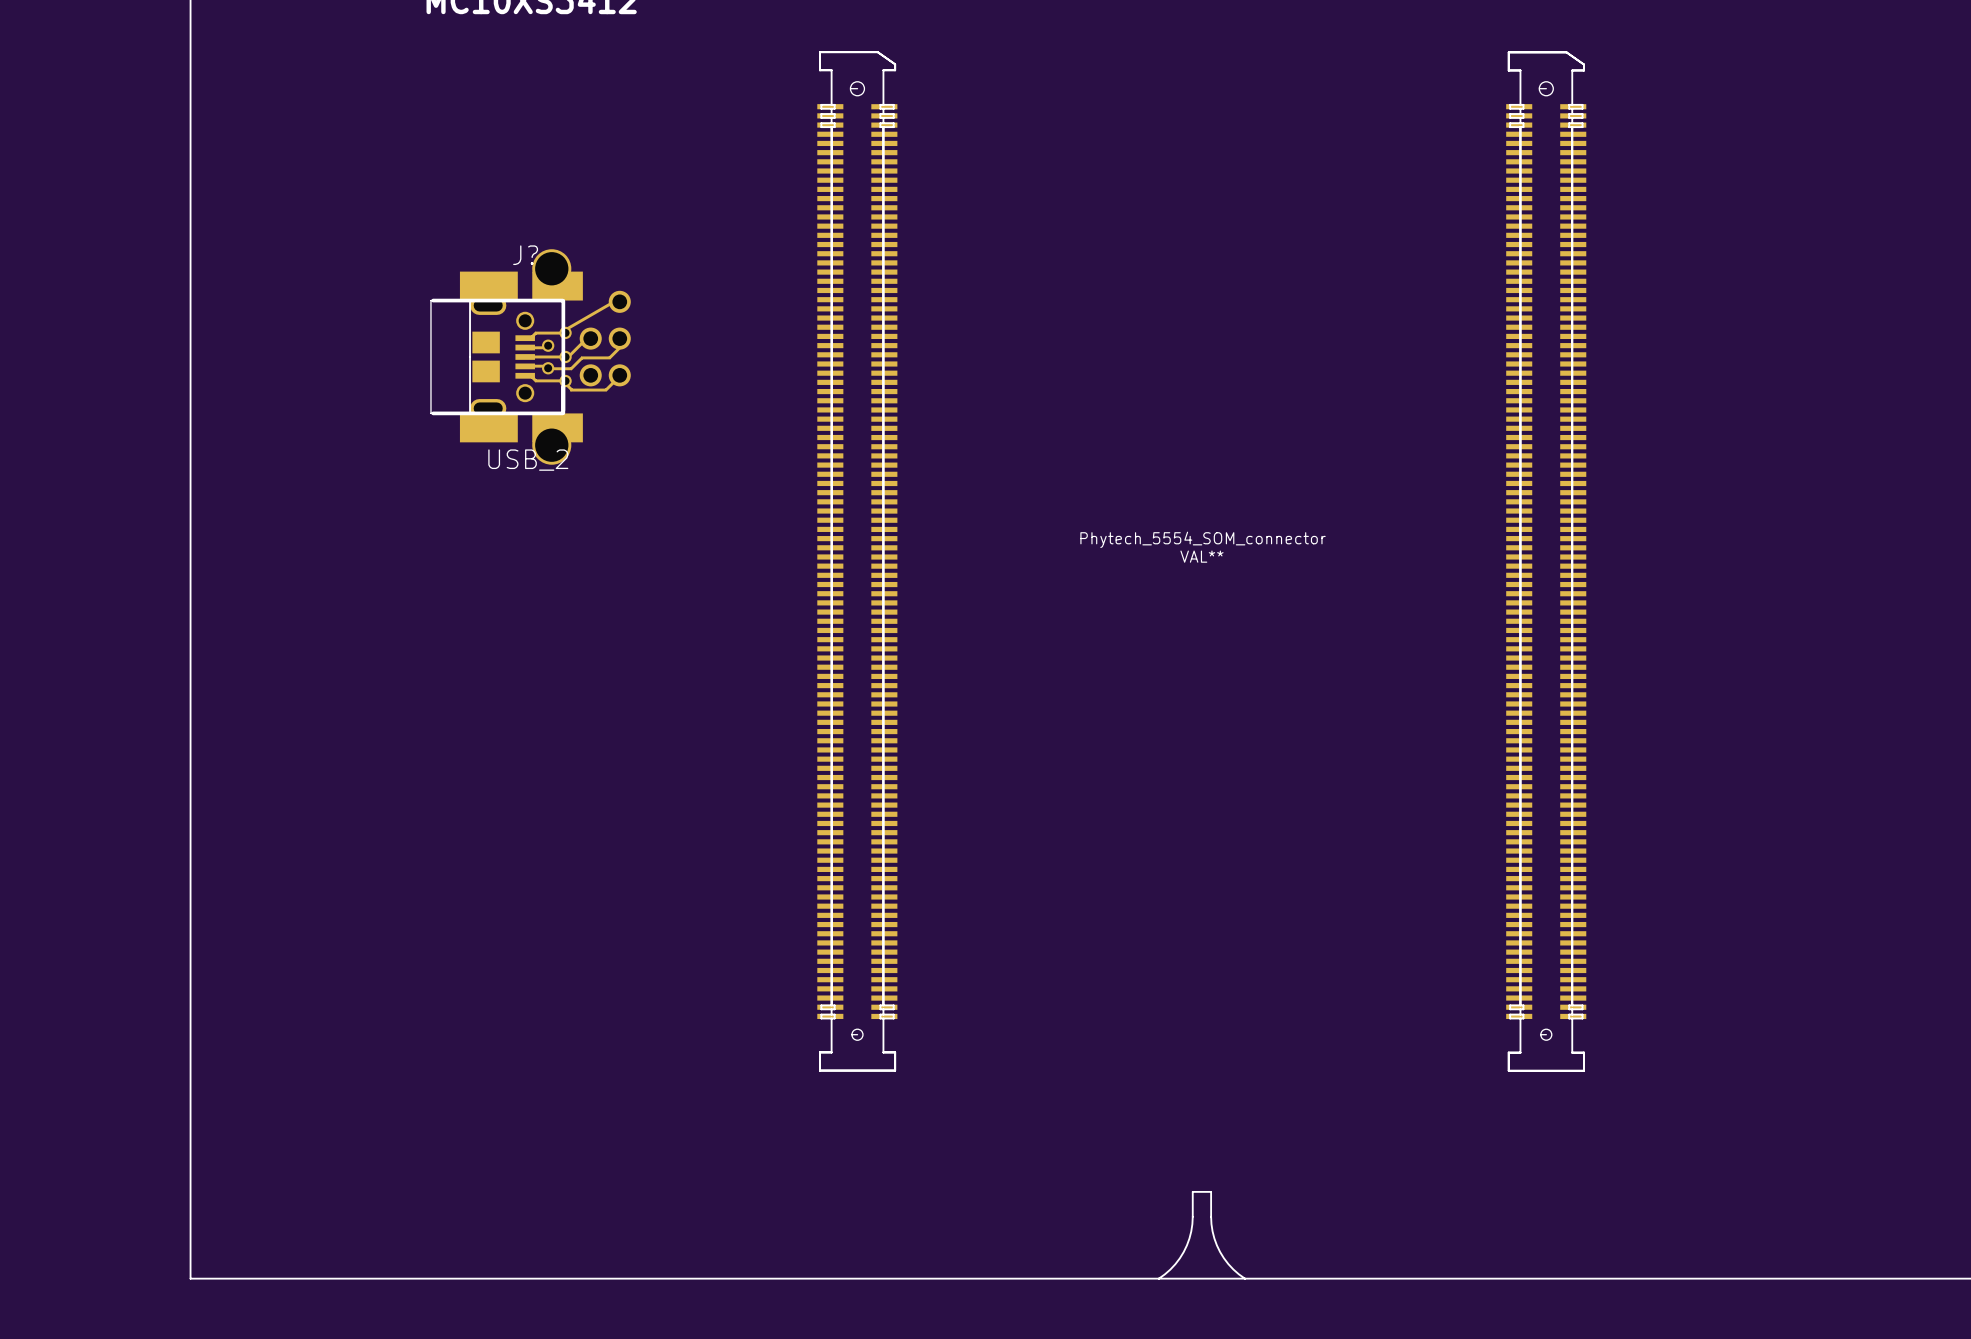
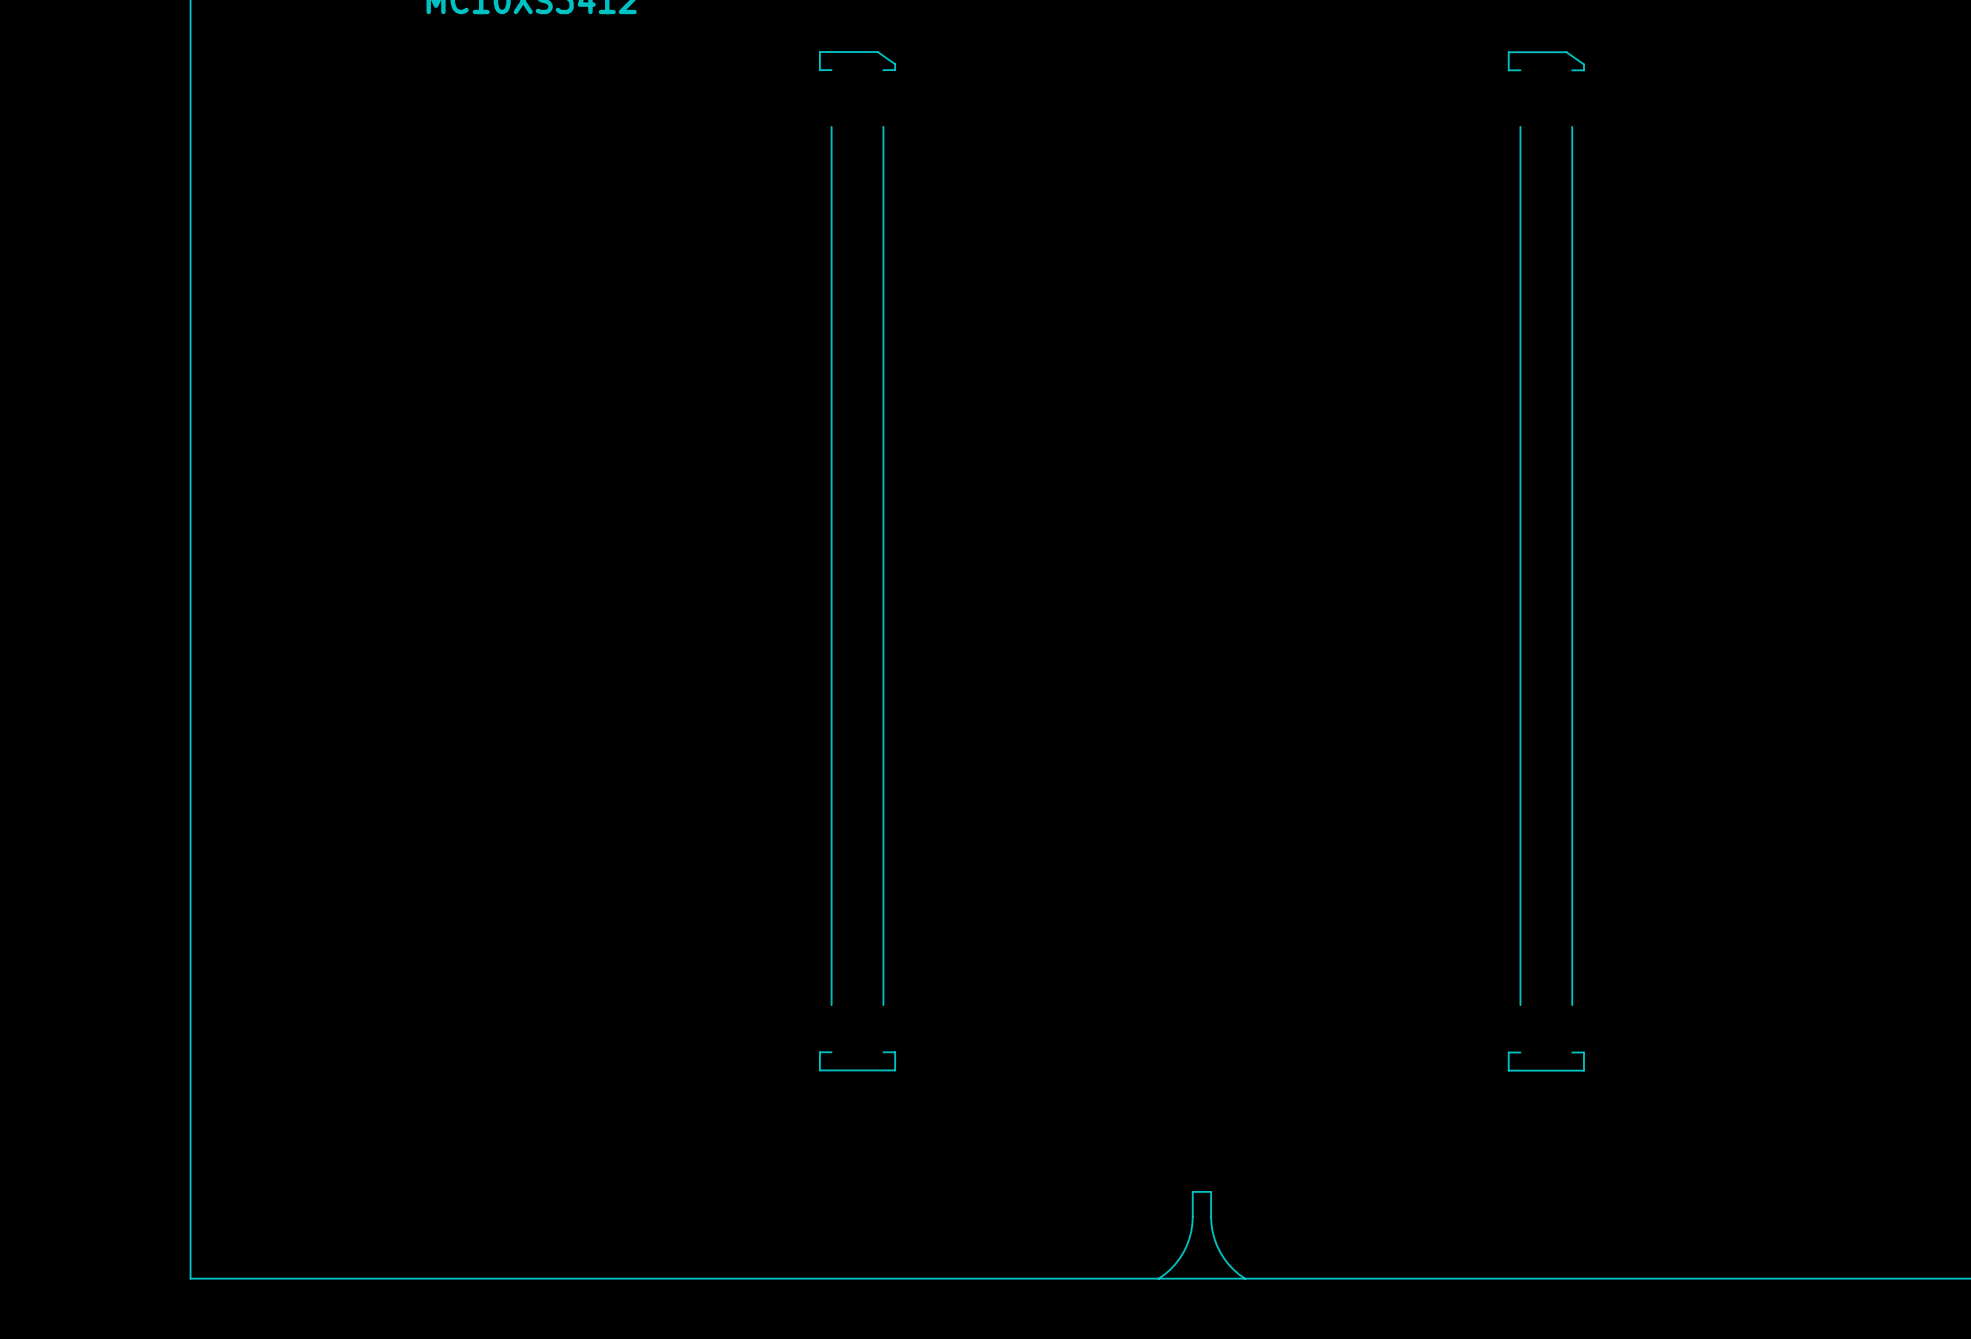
J?: USB_2 (530, 356) -> none
Phytech_5554_SOM_connector: VAL** (1201, 561) -> none

